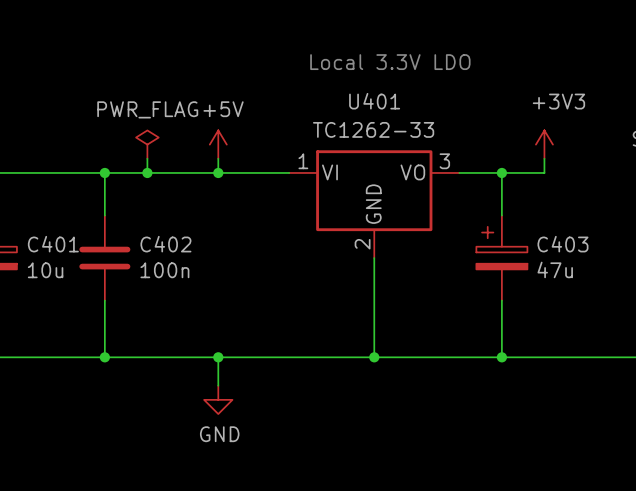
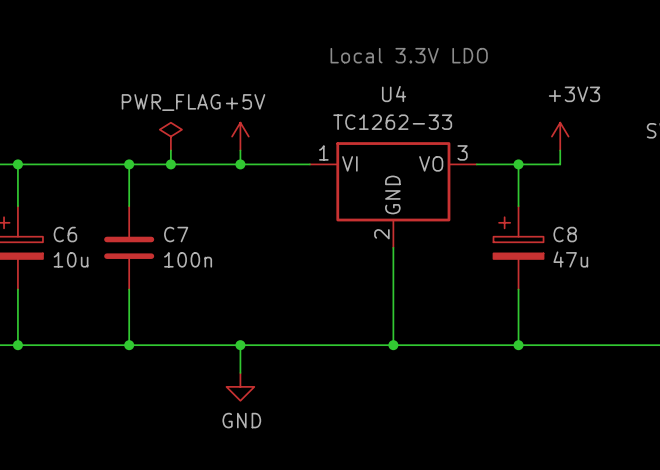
U401 name: U401 (374, 101) -> U4 (394, 94)
C401 name: C401 (53, 244) -> C6 (65, 234)
C402 name: C402 (165, 244) -> C7 (176, 234)
C403 name: C403 (562, 244) -> C8 (565, 234)

